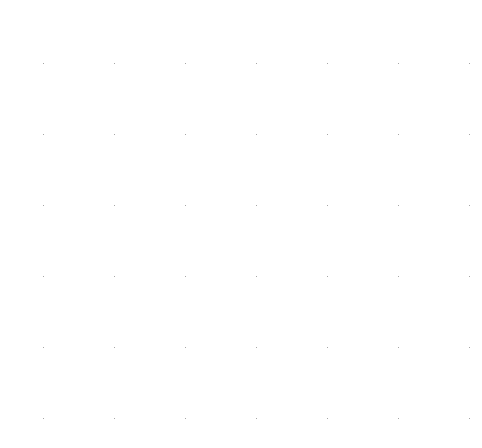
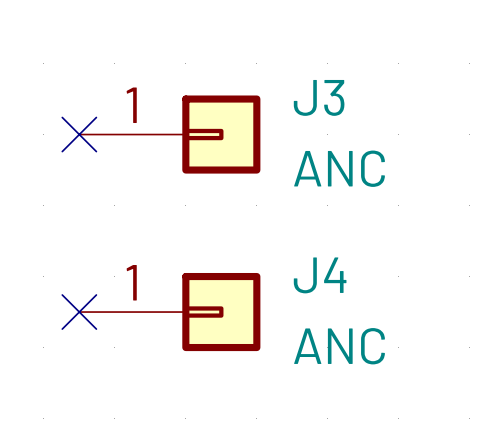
no-connect mark: none -> (79, 134)
J3: none -> ANC (169, 134)
no-connect mark: none -> (79, 312)
J4: none -> ANC (169, 312)

